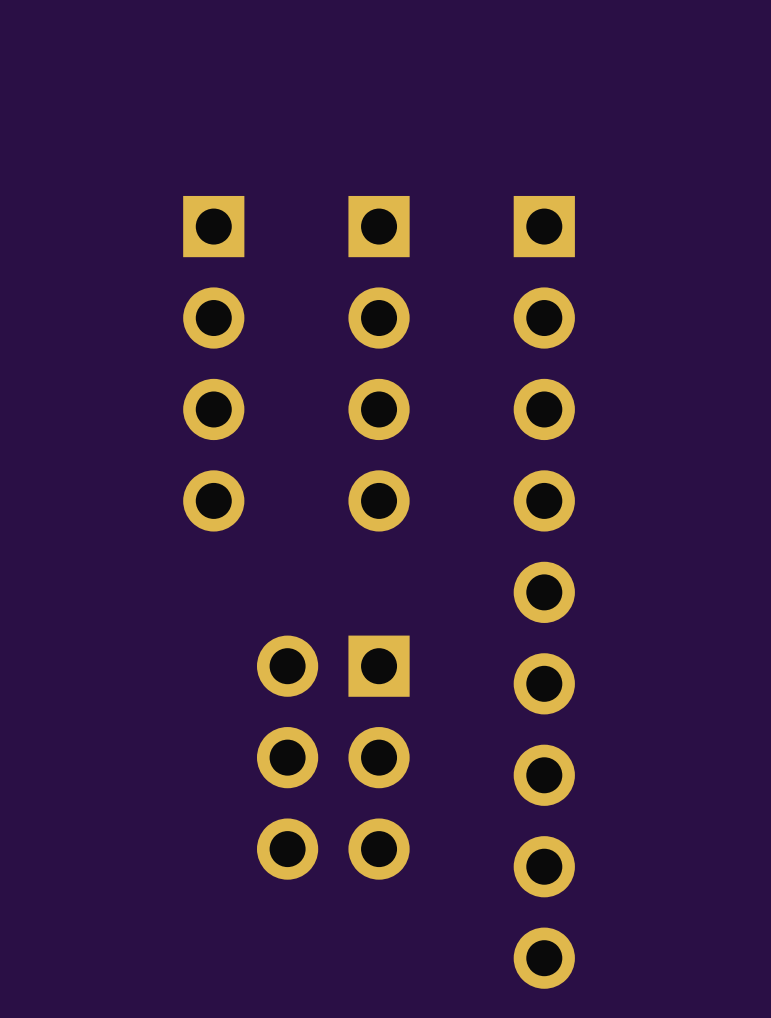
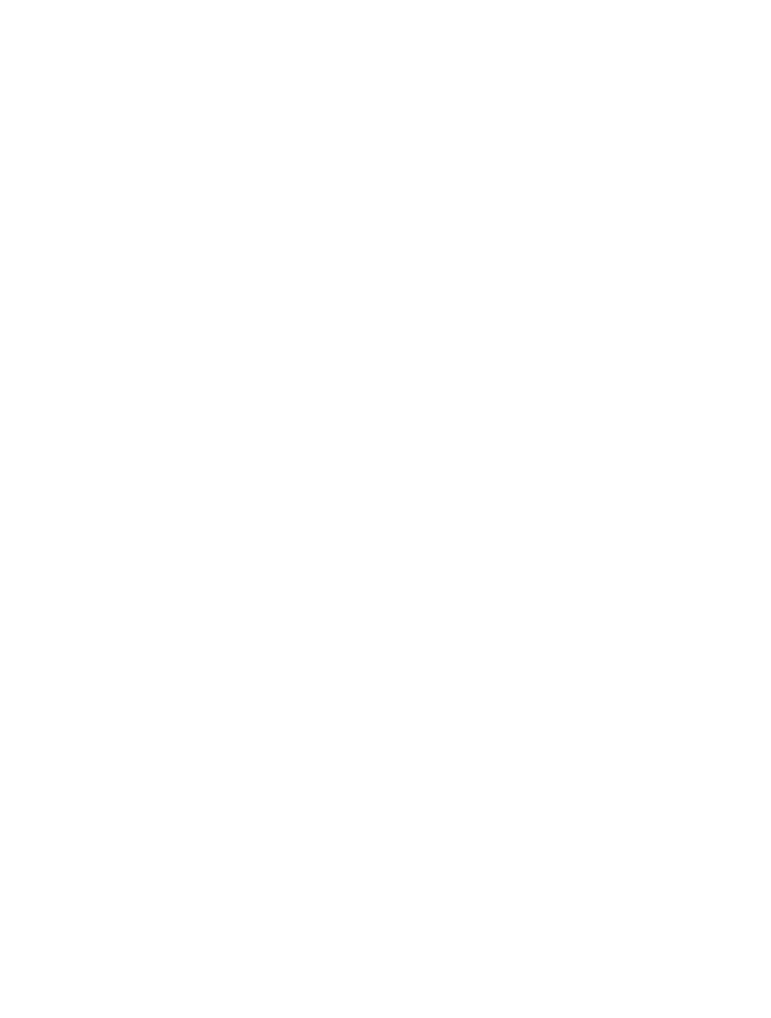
part: (213, 363) -> none
part: (379, 363) -> none
part: (544, 592) -> none
part: (333, 757) -> none

